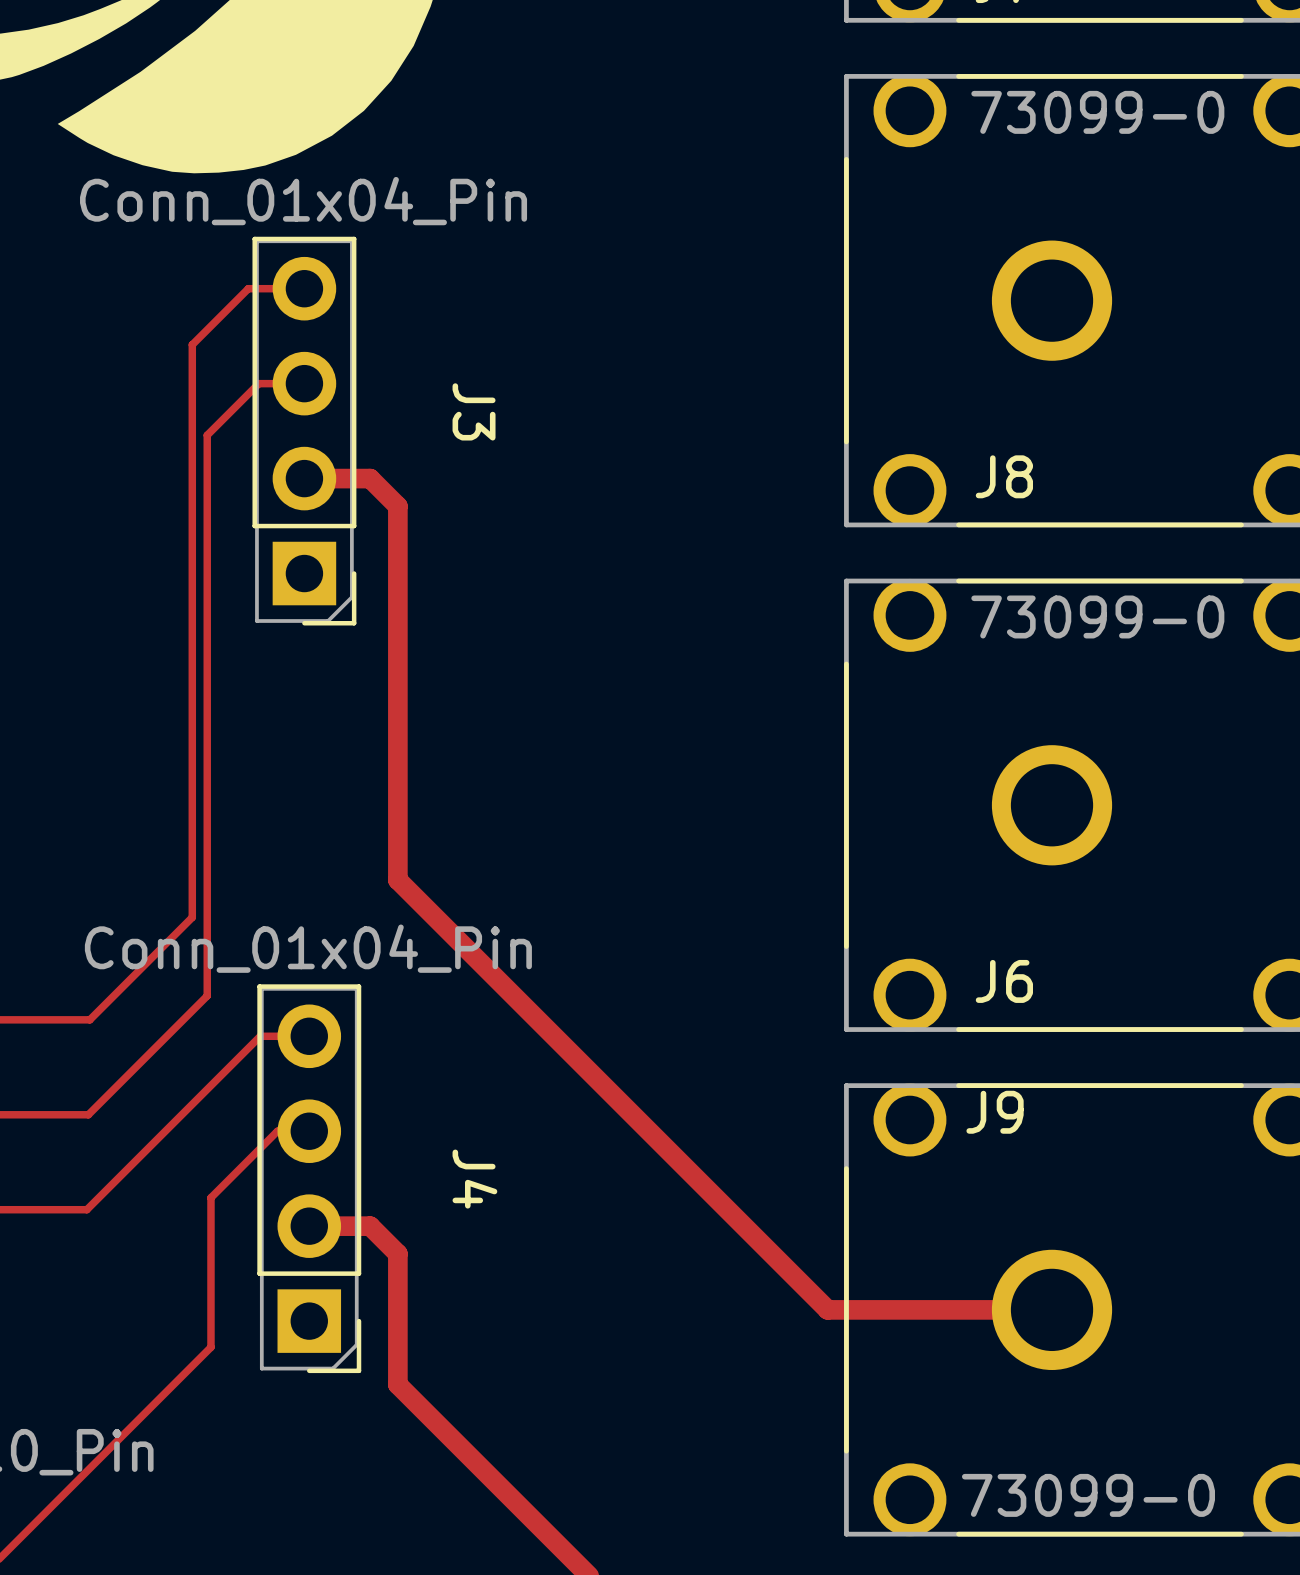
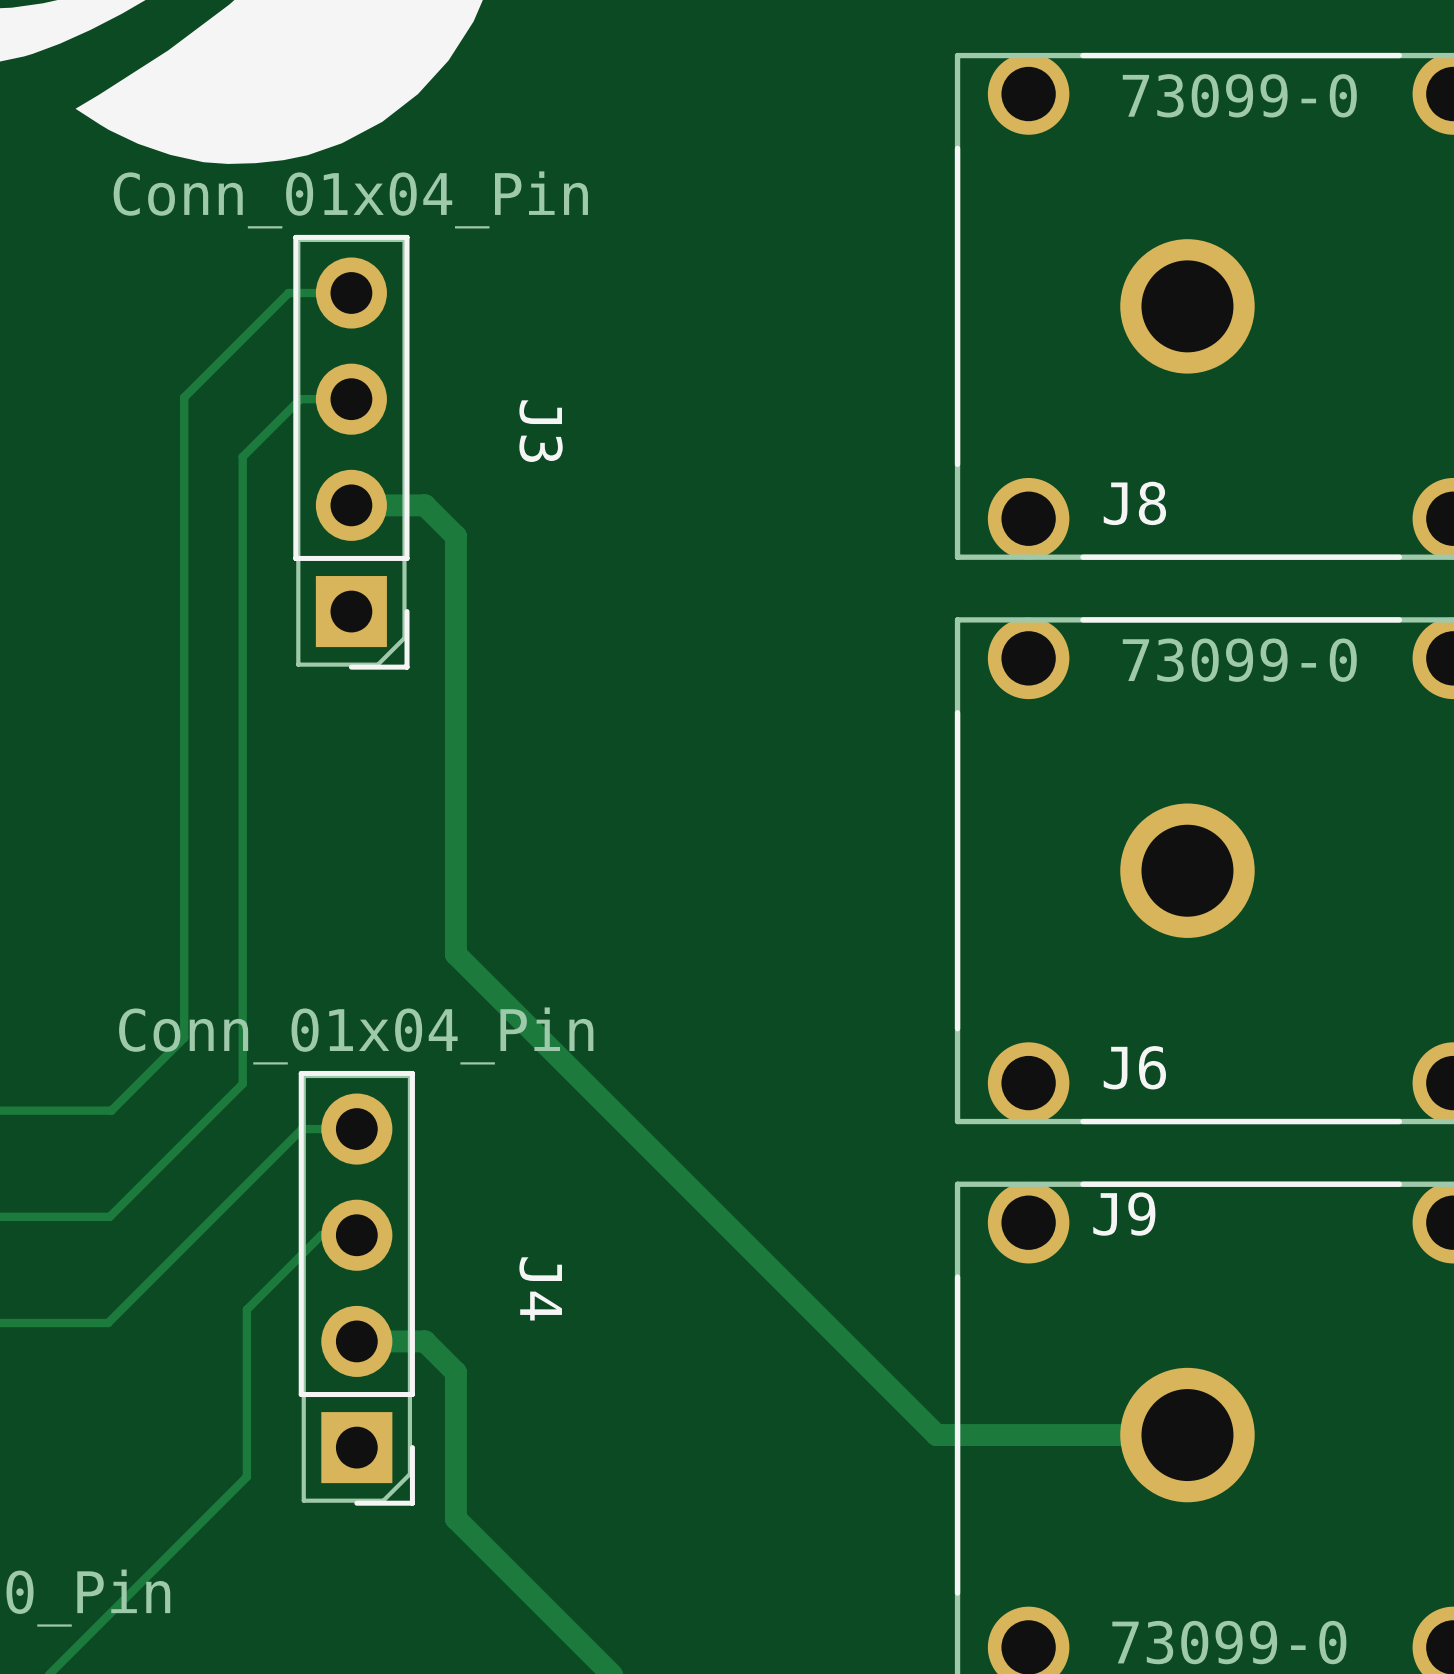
track: (192, 344) (192, 917) (154, 954) -> (225, 355) (184, 397) (184, 1037)

